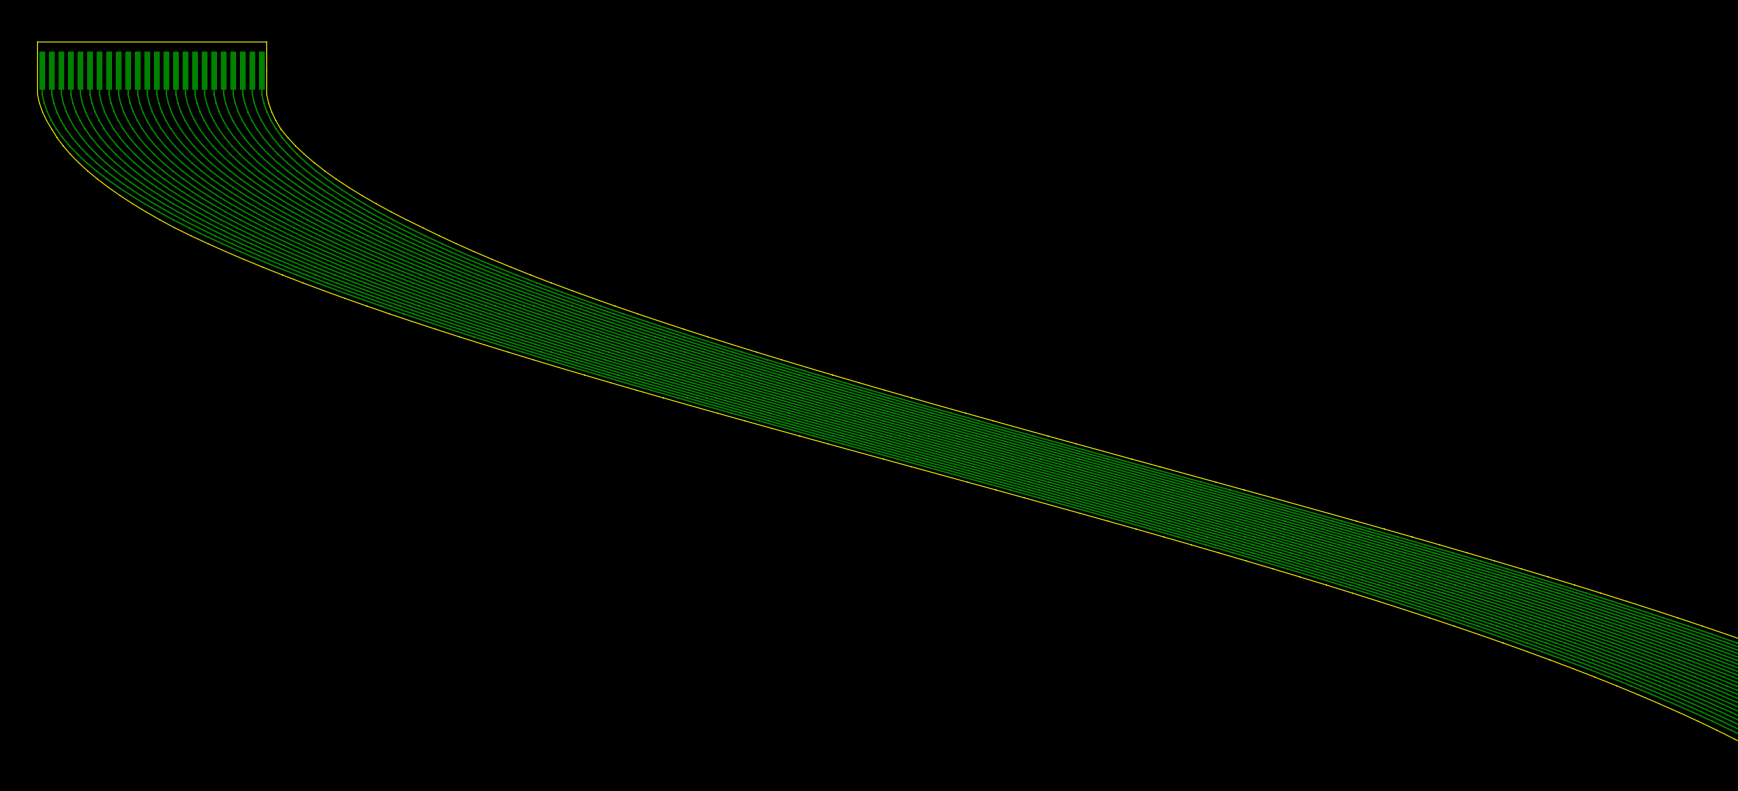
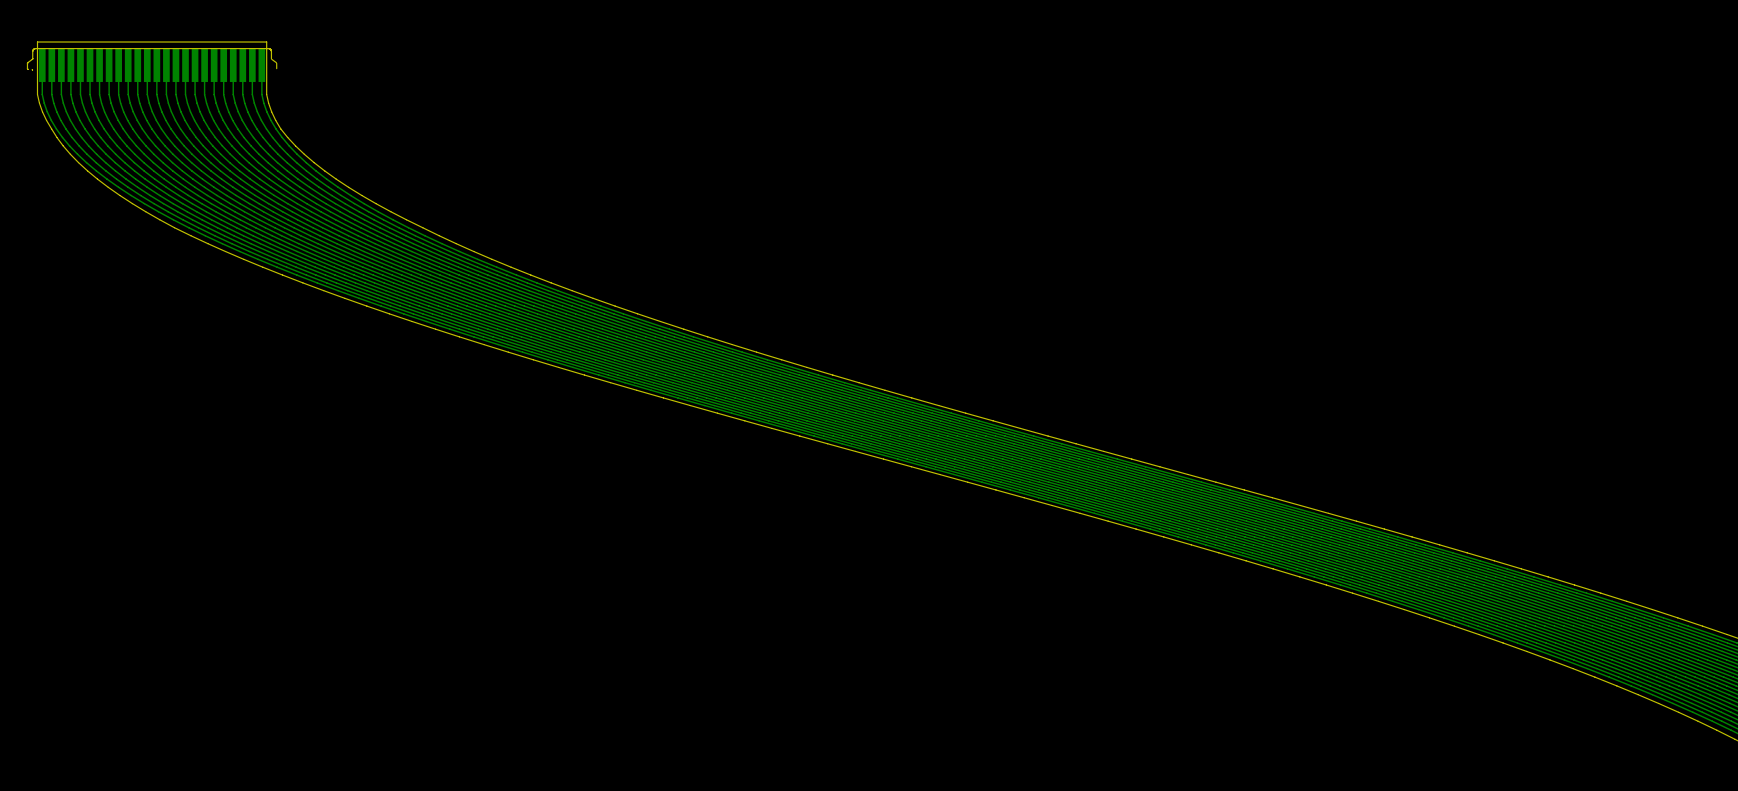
part footprint: [39, 51, 265, 90] -> [38, 48, 266, 83]
board edge: none -> (32, 58) (32, 50) (35, 48) (268, 48) (271, 50) (271, 58)
board edge: none -> (32, 59) (27, 62)
board edge: none -> (271, 59) (276, 62)
board edge: none -> (27, 63) (27, 68)
board edge: none -> (276, 63) (276, 68)

